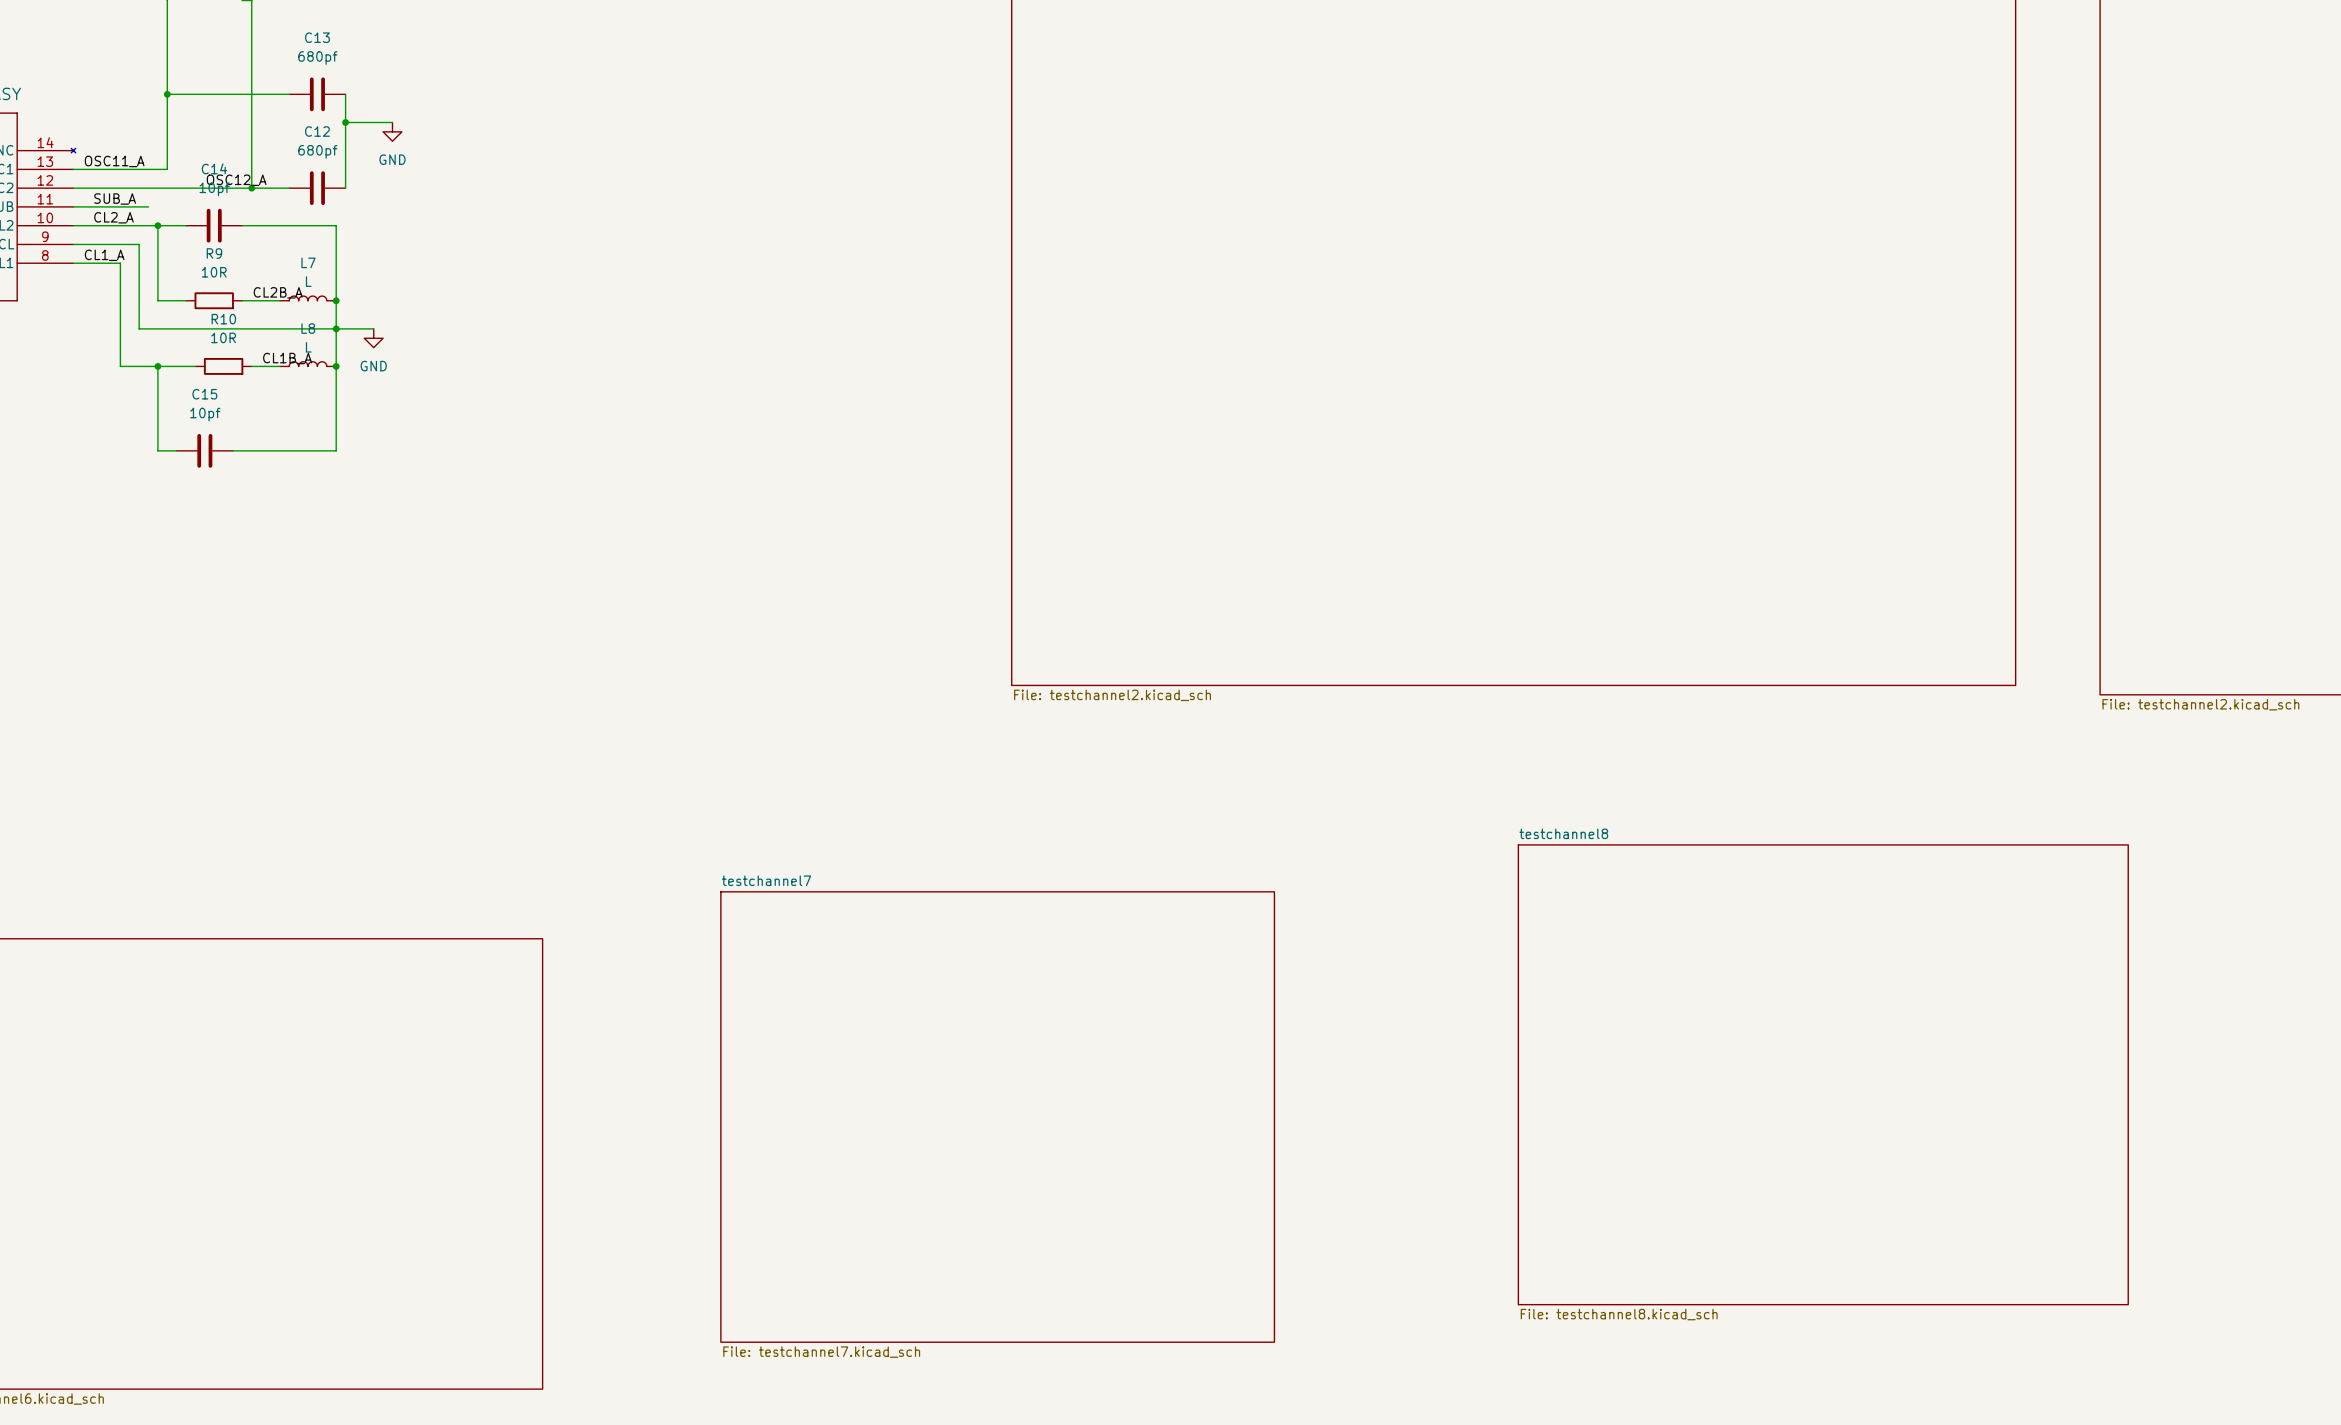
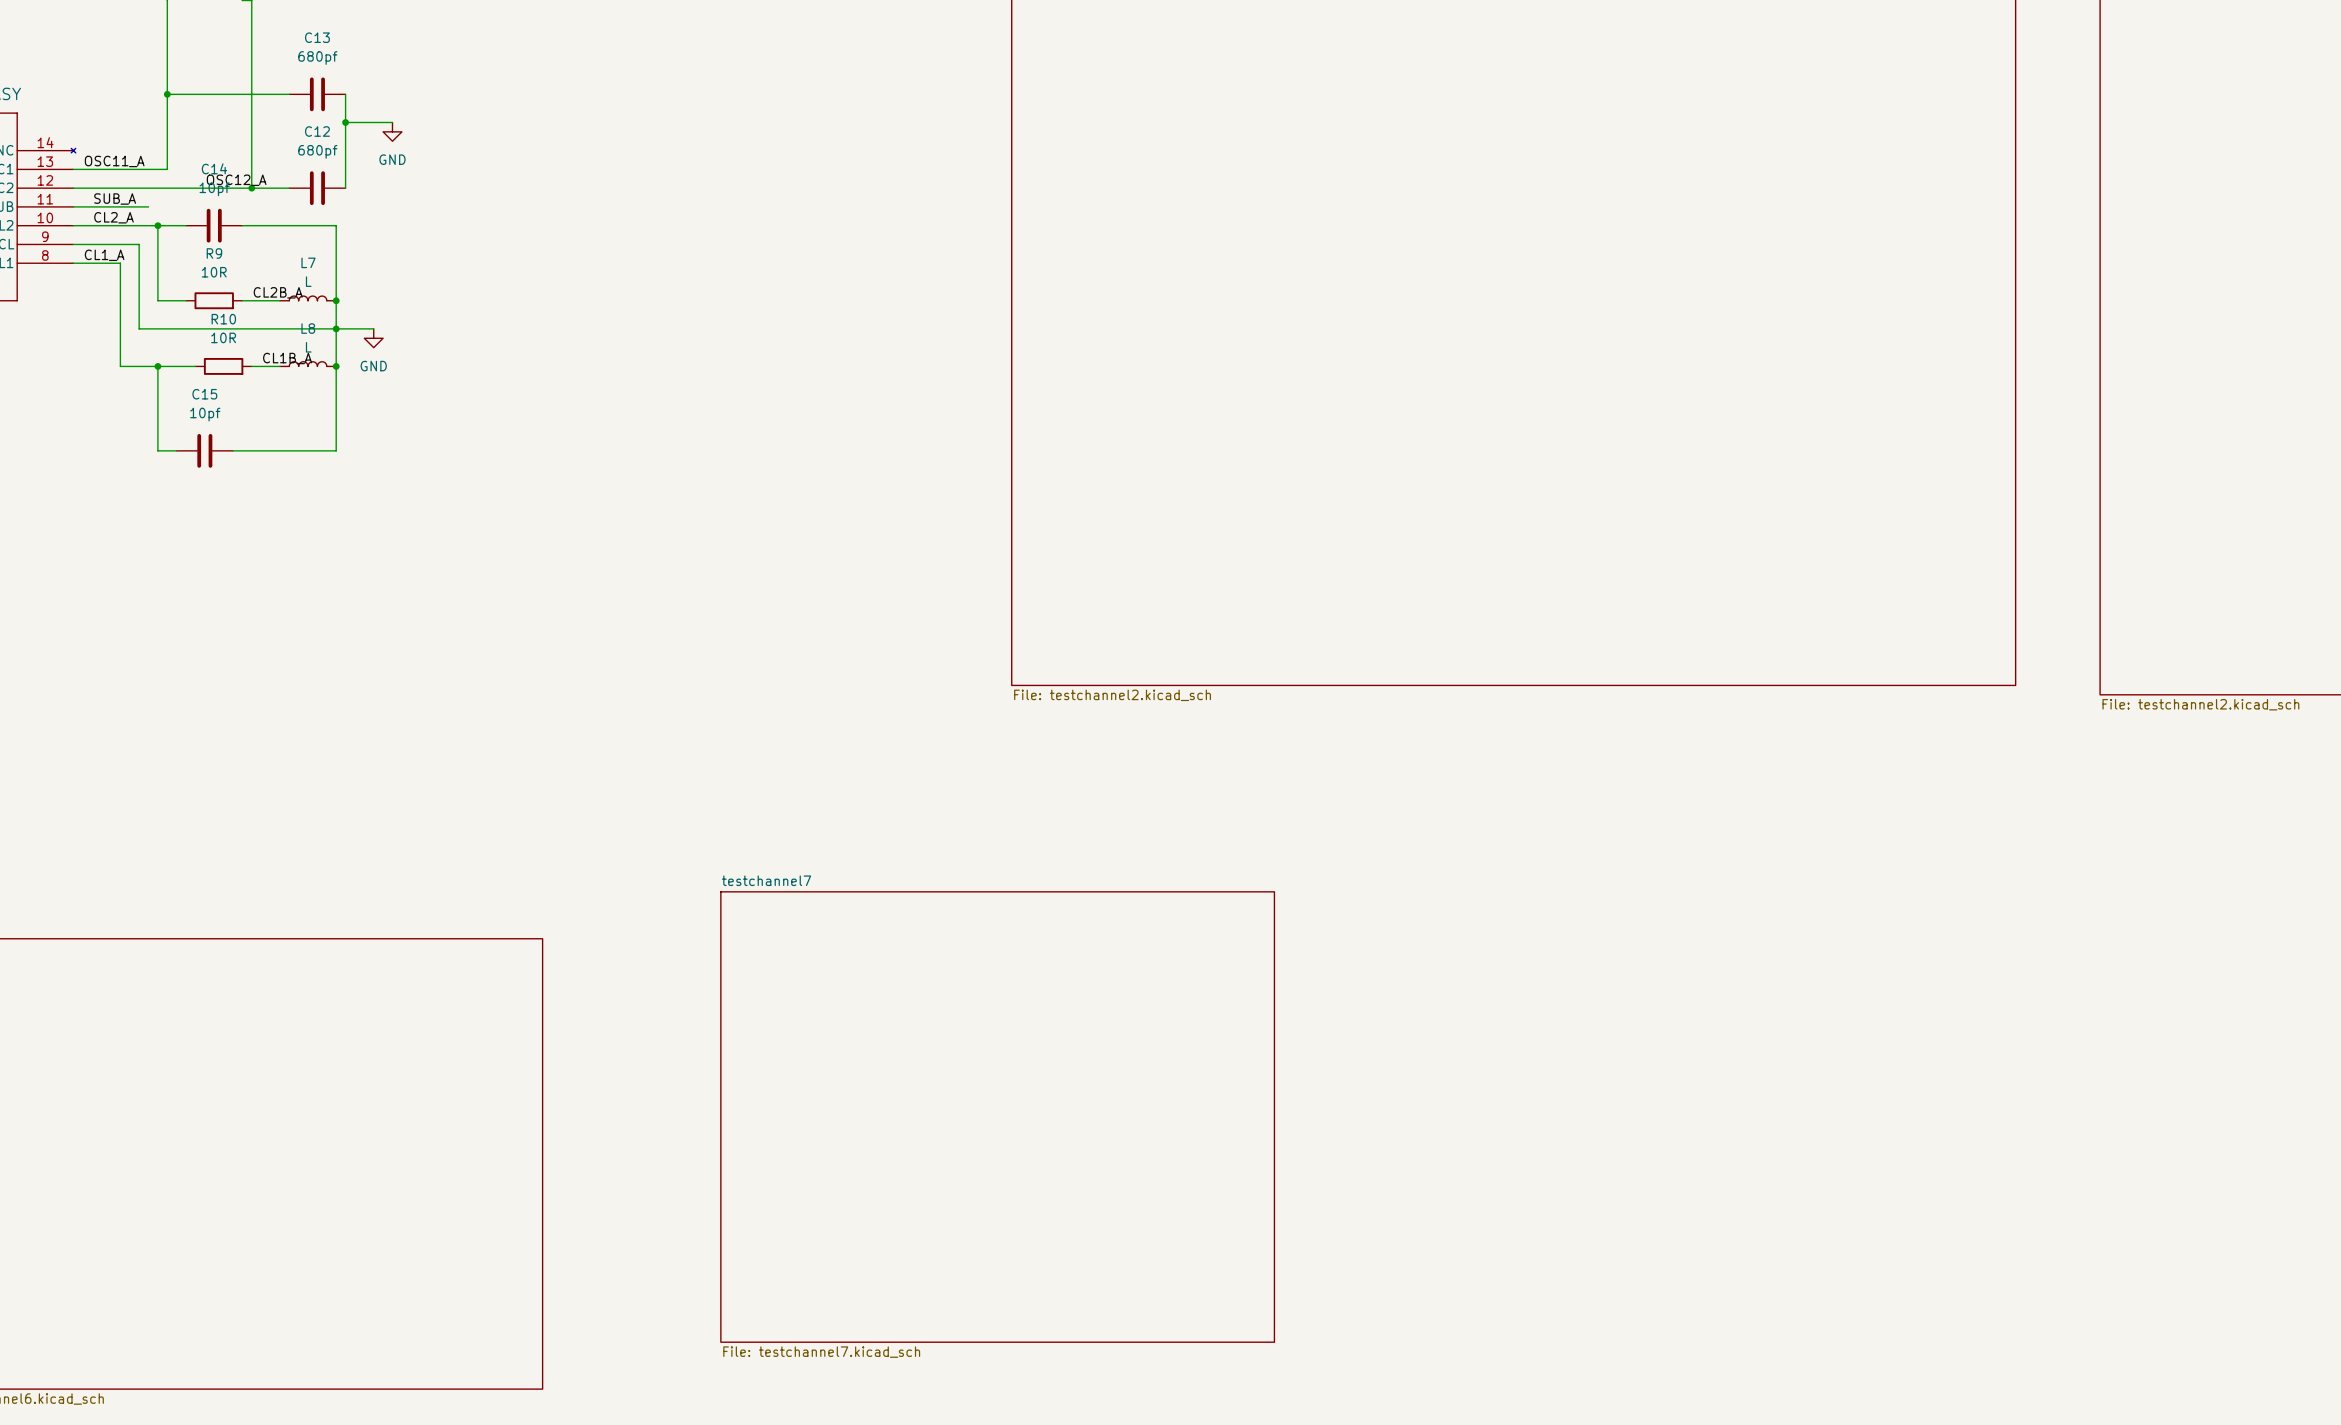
sheet testchannel8: File: testchannel8.kicad_sch (1823, 1074) -> none

